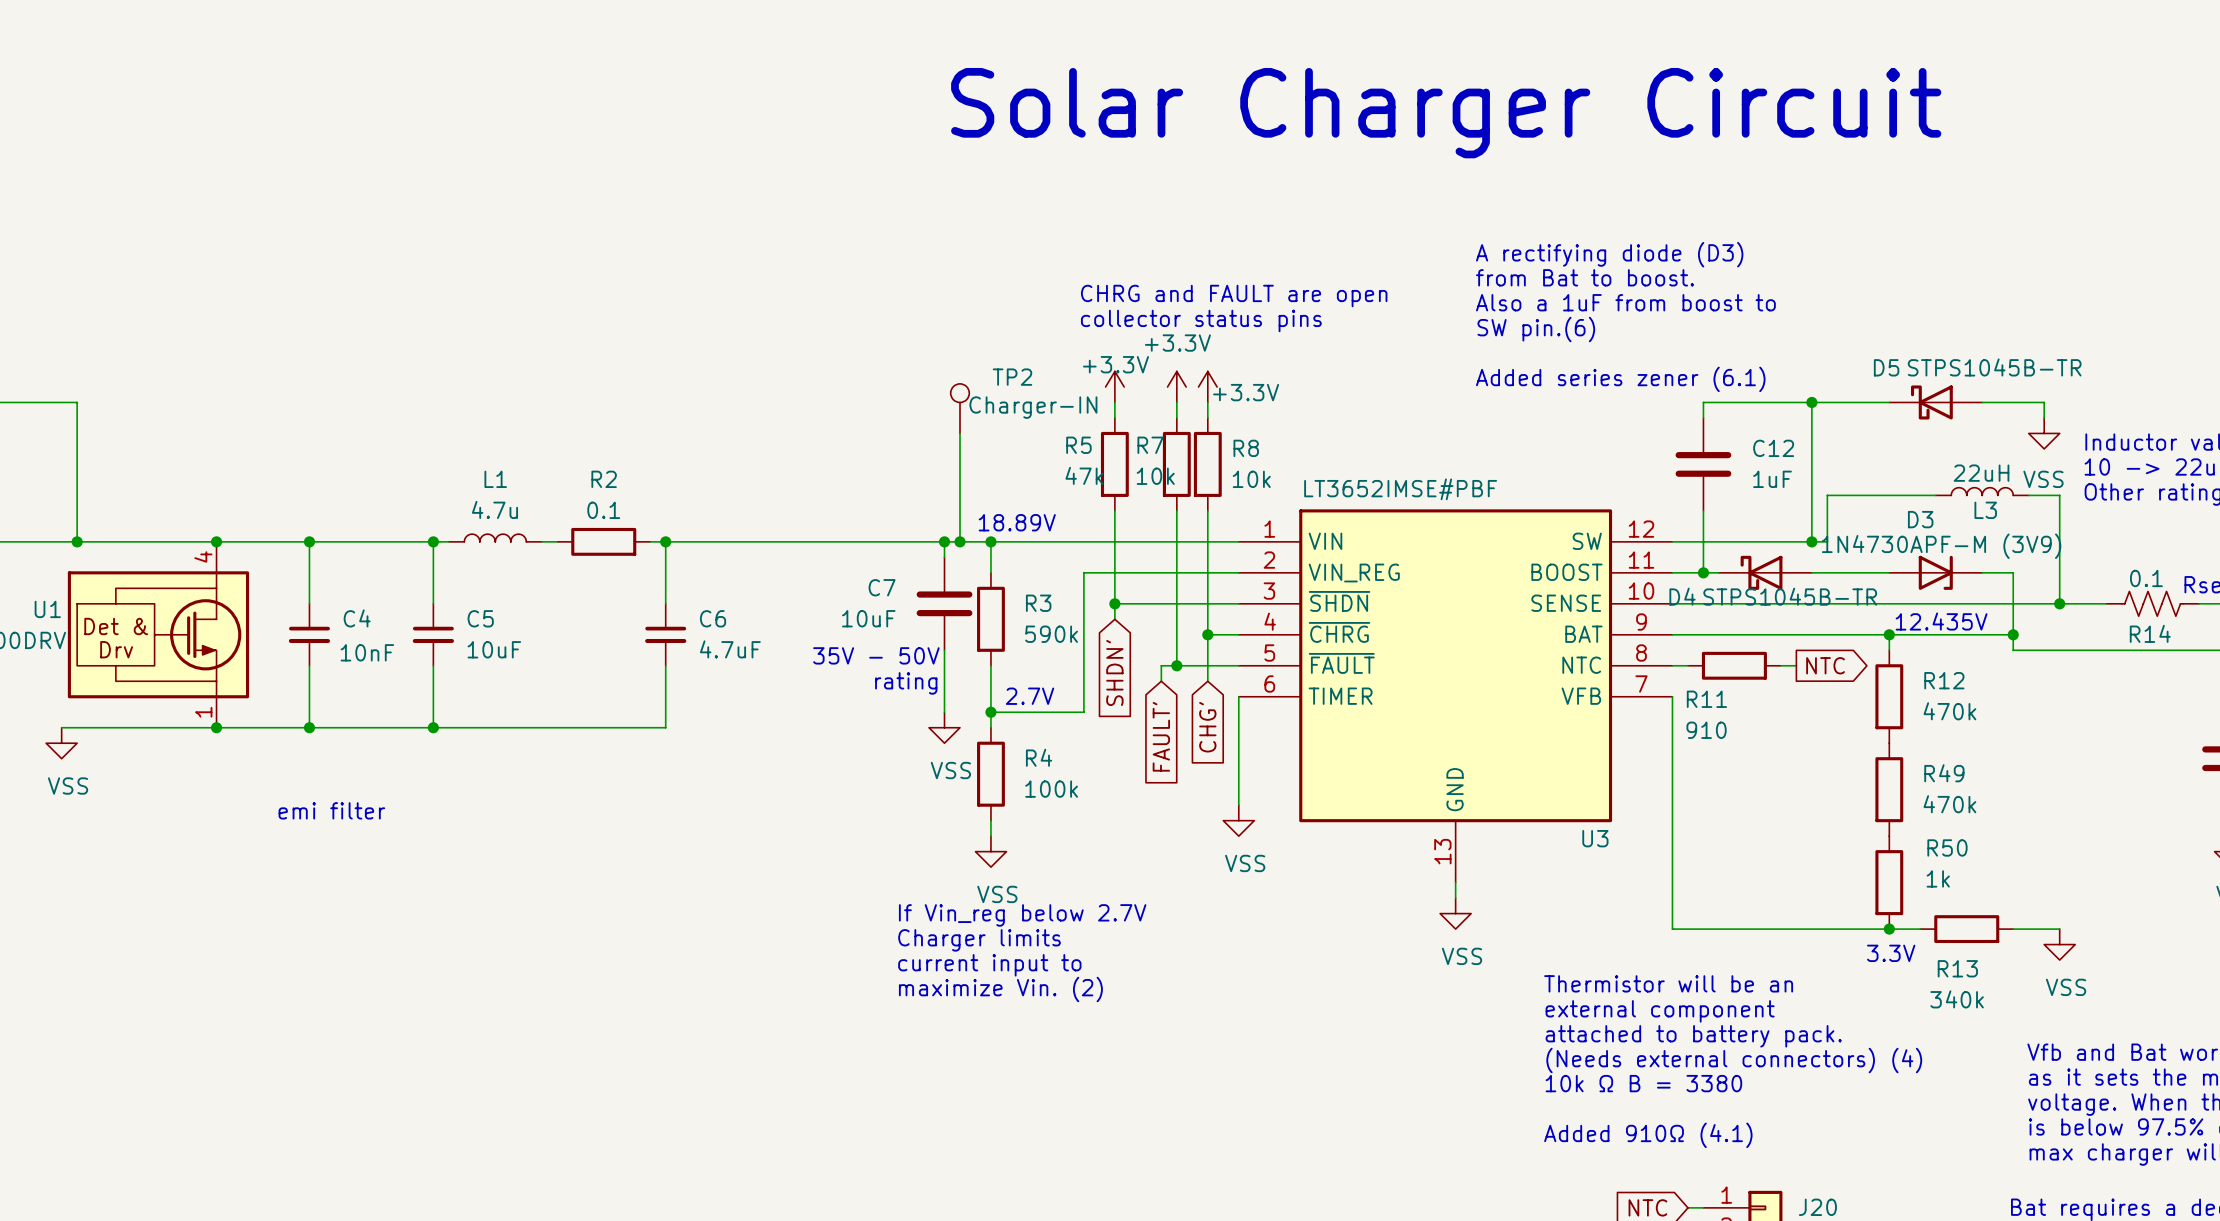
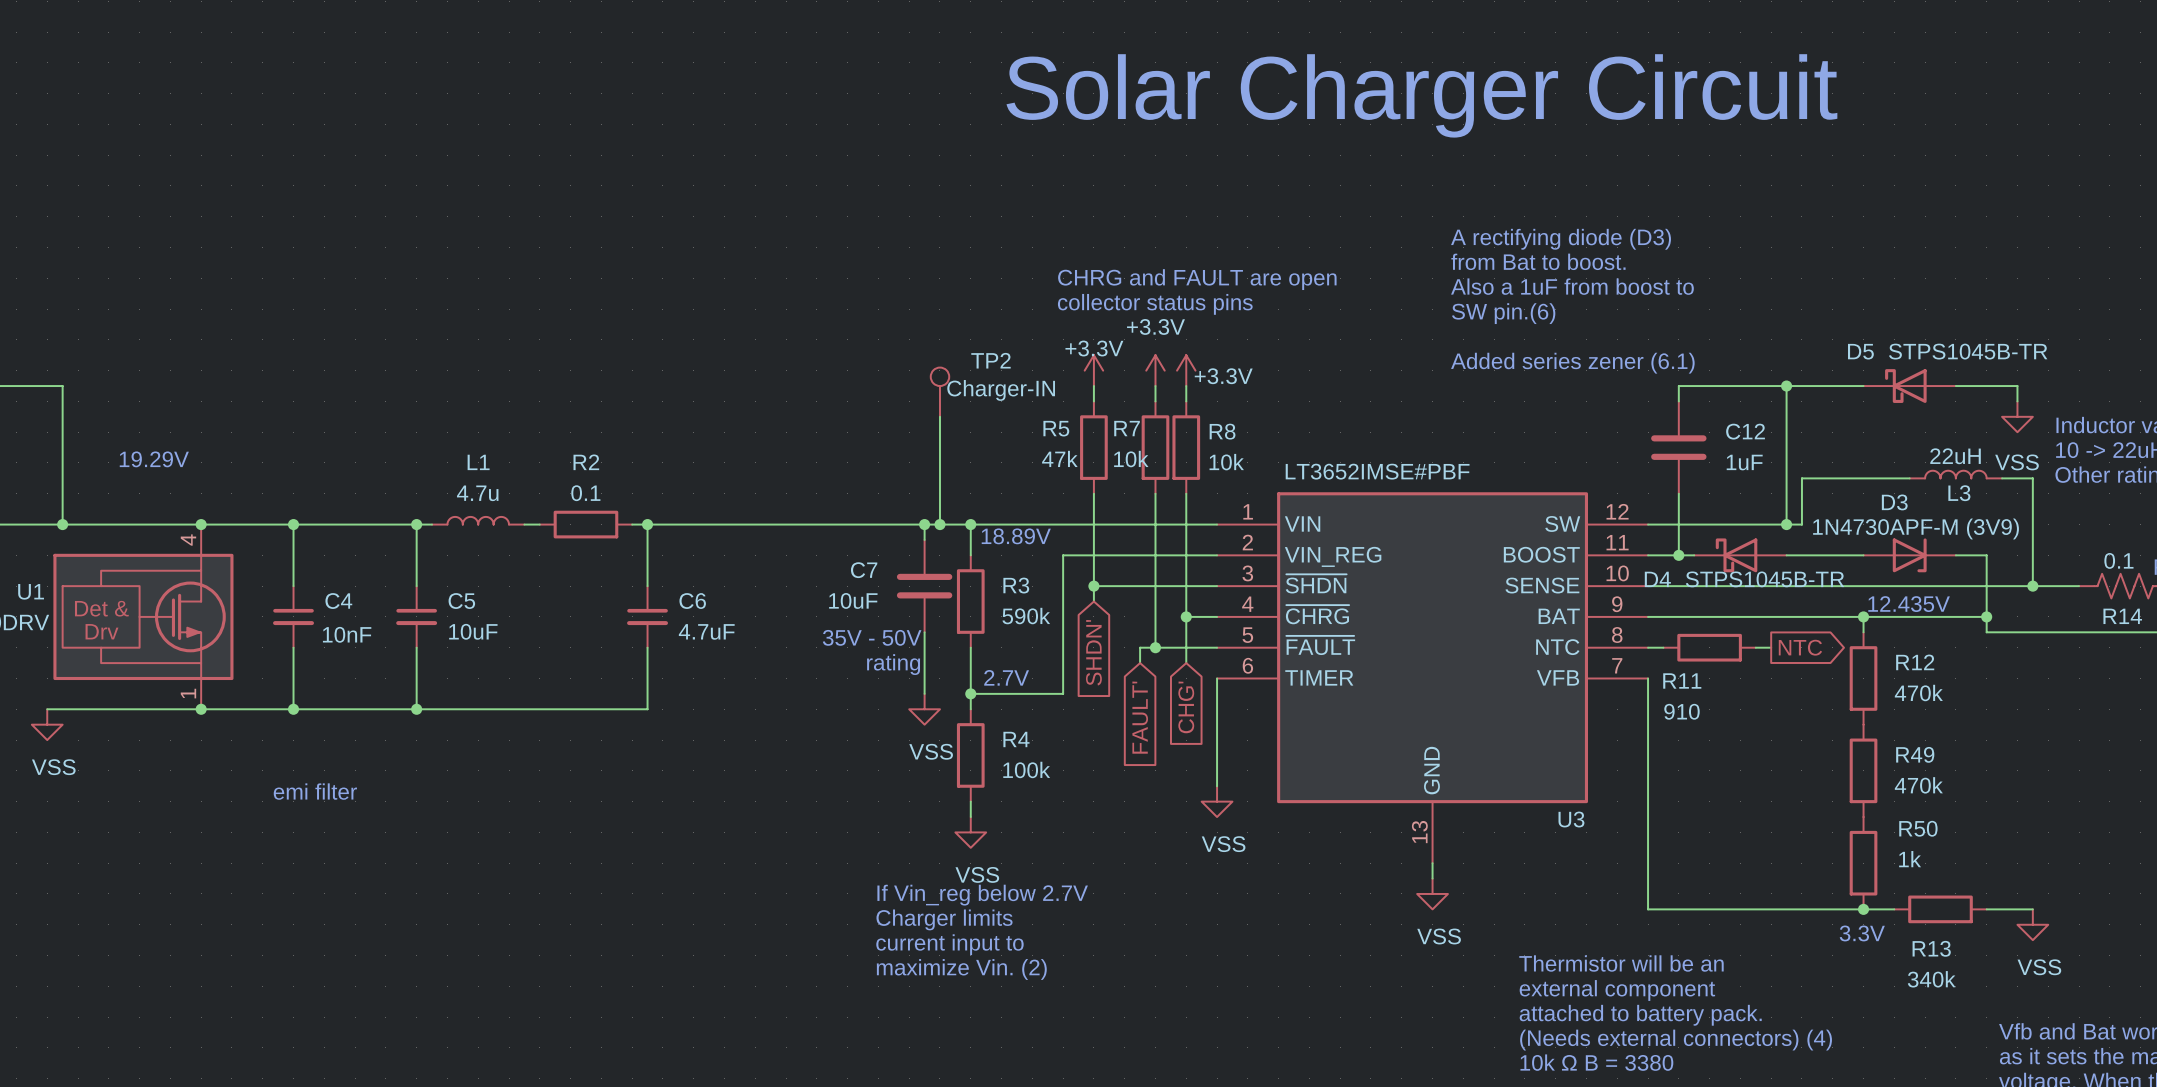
text: none -> 19.29V (154, 459)
text position: 18.89V (1017, 522) -> 18.89V (1016, 536)

